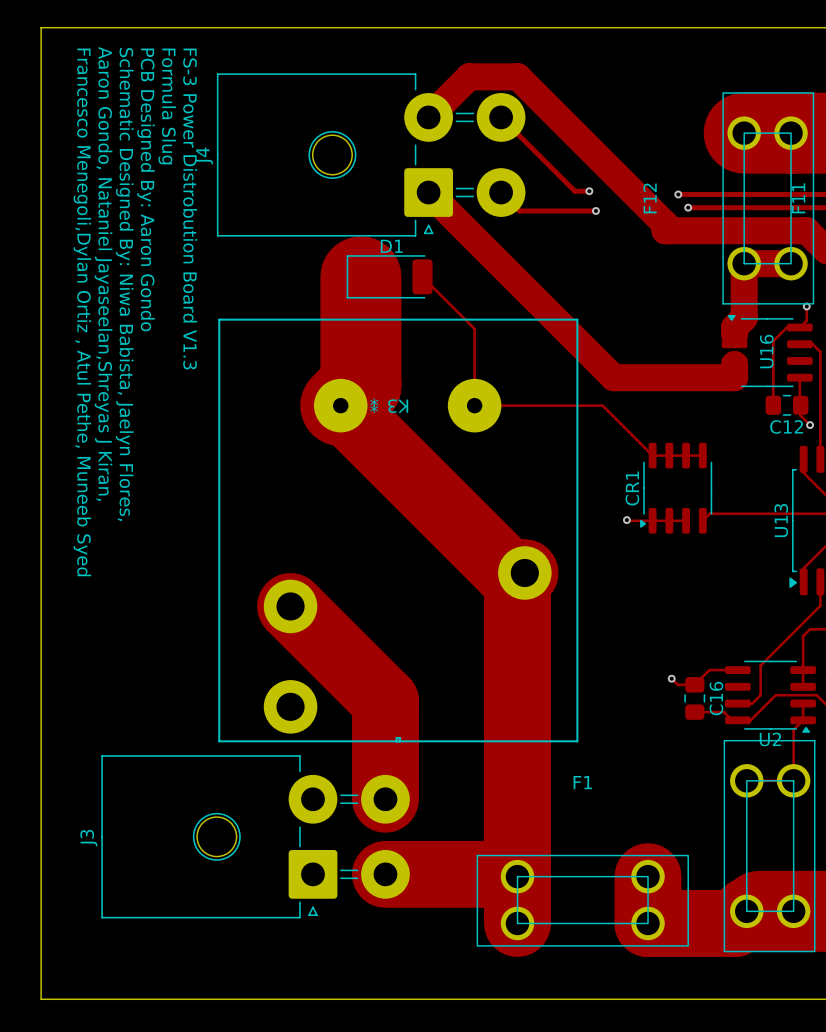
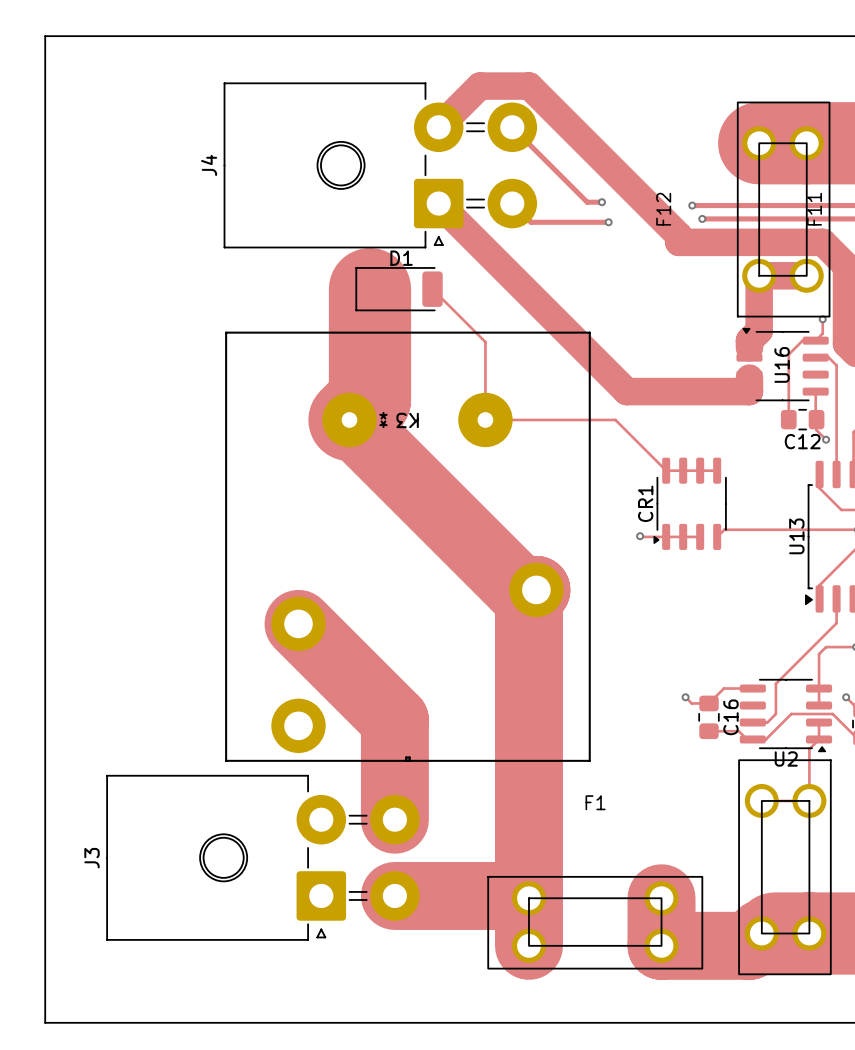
text: Formula Slug (167, 106) -> none
text: PCB Designed By: Aaron Gondo (146, 189) -> none
text: FS-3 Power Distrobution Board V1.3 (190, 209) -> none
text: Aaron Gondo, Nataniel Jayaseelan,Shreyas J Kiran, (103, 273) -> none
text: Schematic Designed By: Niwa Babista, Jaelyn Flores, (124, 284) -> none
text: Francesco Menegoli,Dylan Ortiz , Atul Pethe, Muneeb Syed (82, 312) -> none

